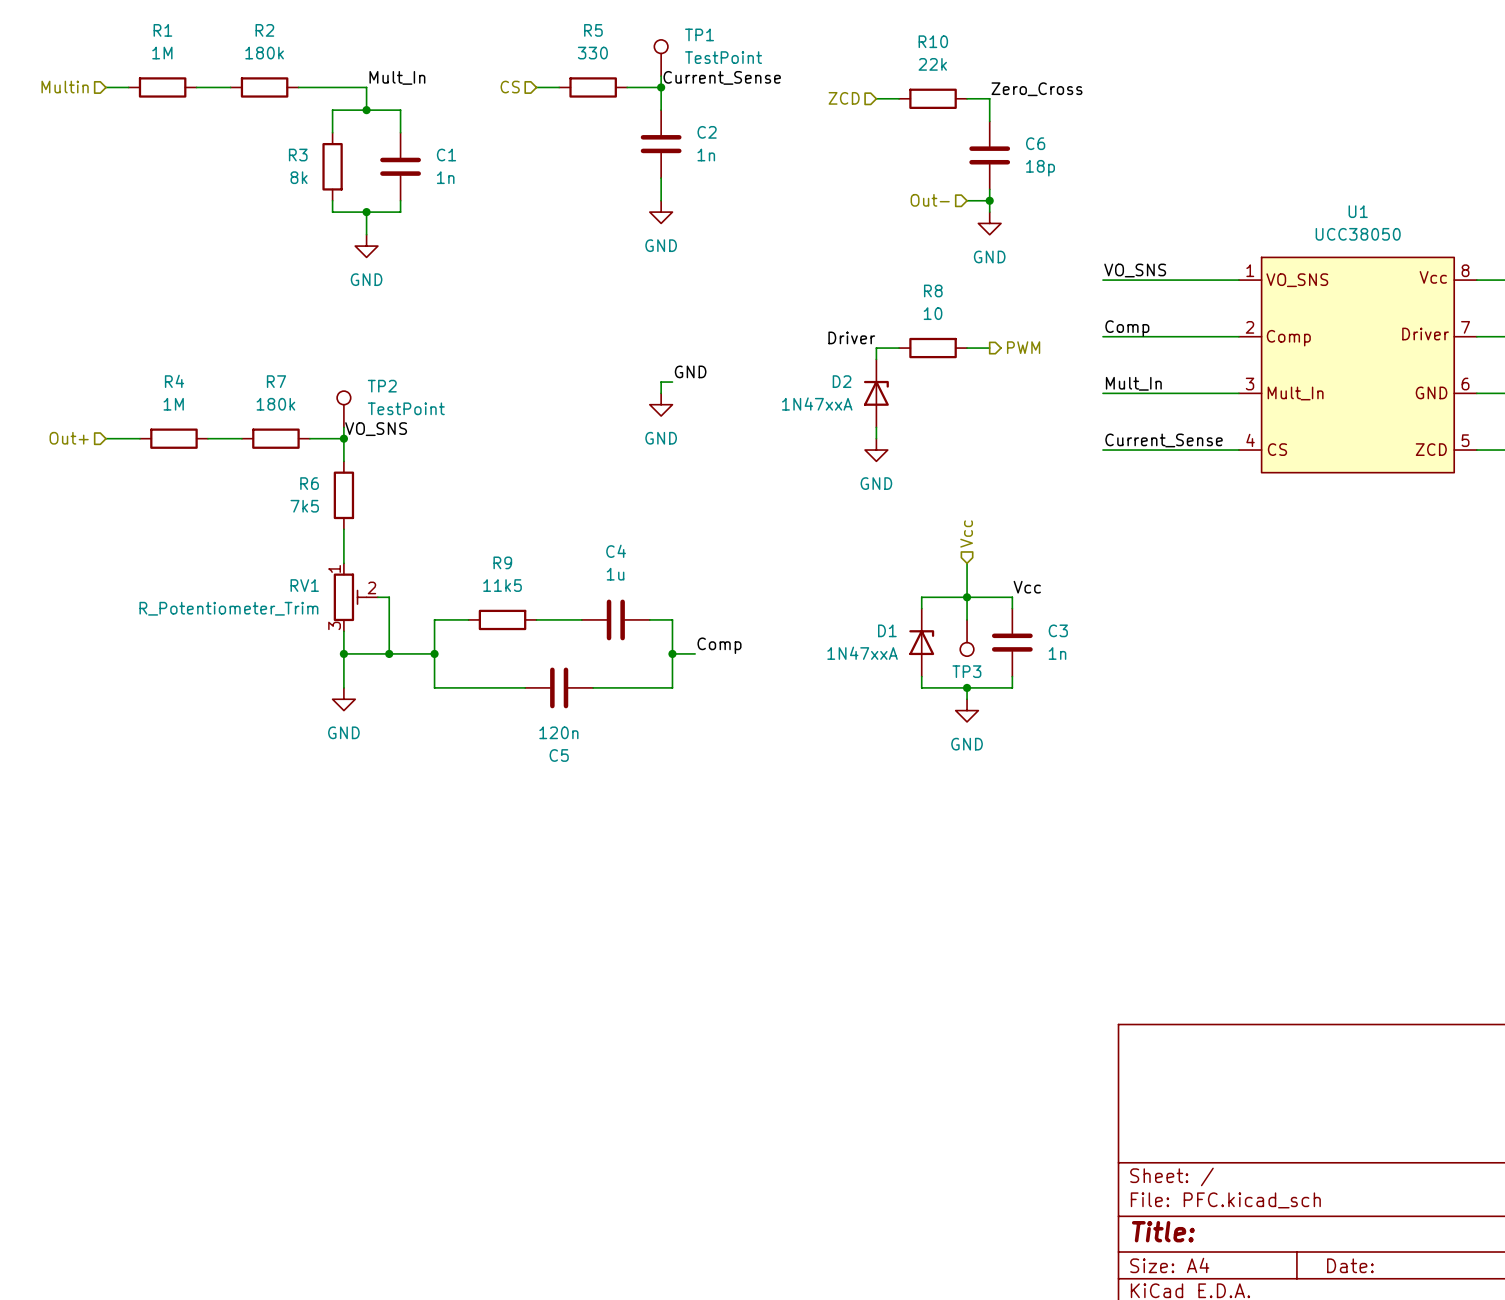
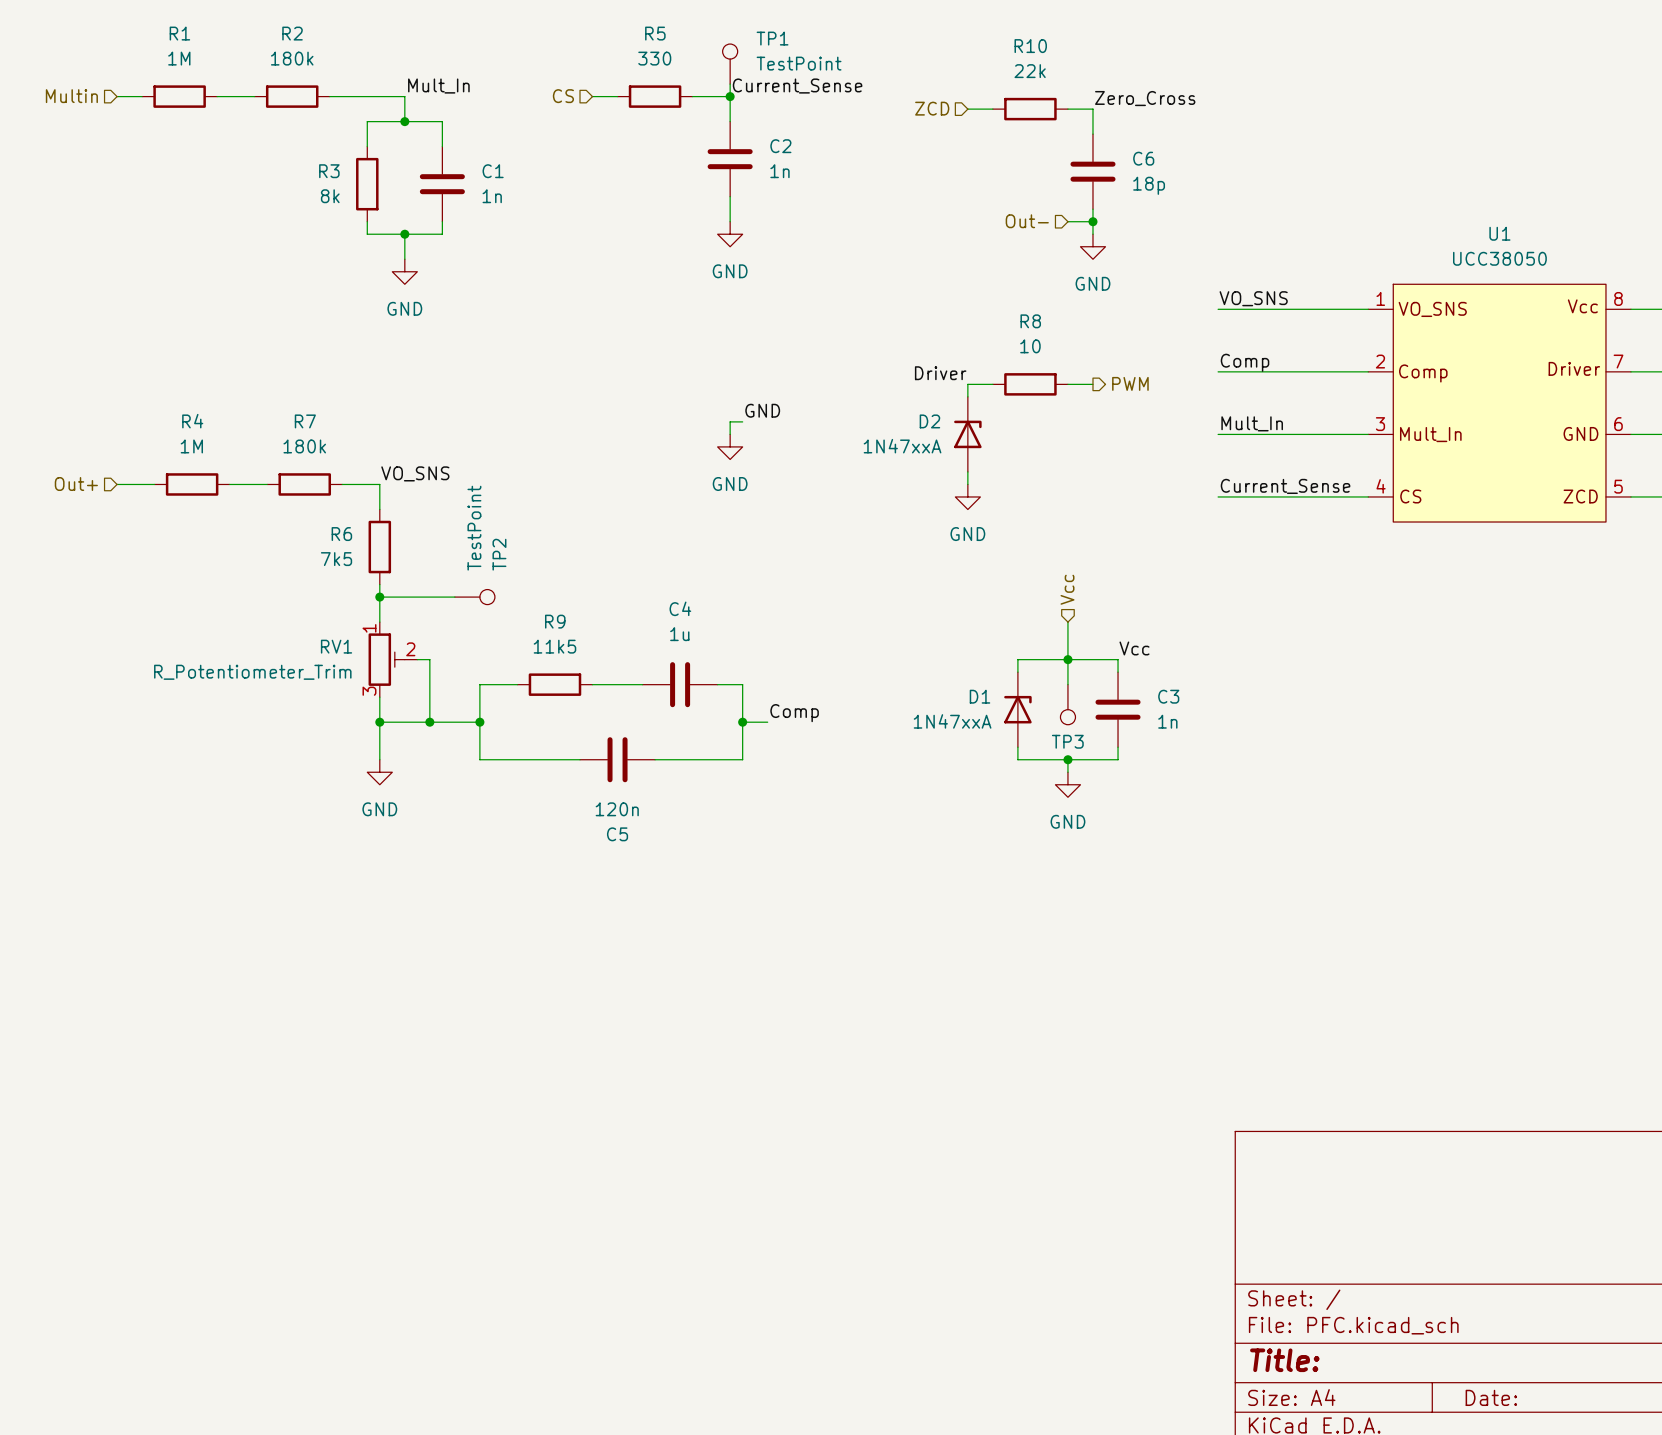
TP2 name position: TP2 (382, 386) -> TP2 (499, 554)
TP2 rotation: 0° (343, 397) -> 90° clockwise (487, 597)
TP2 value position: TestPoint (406, 408) -> TestPoint (474, 528)
TP2 position: (343, 409) -> (474, 597)
wire: (343, 427) (343, 438) -> none
junction: (343, 438) -> none
wire: none -> (379, 597) (454, 597)
junction: none -> (379, 597)

